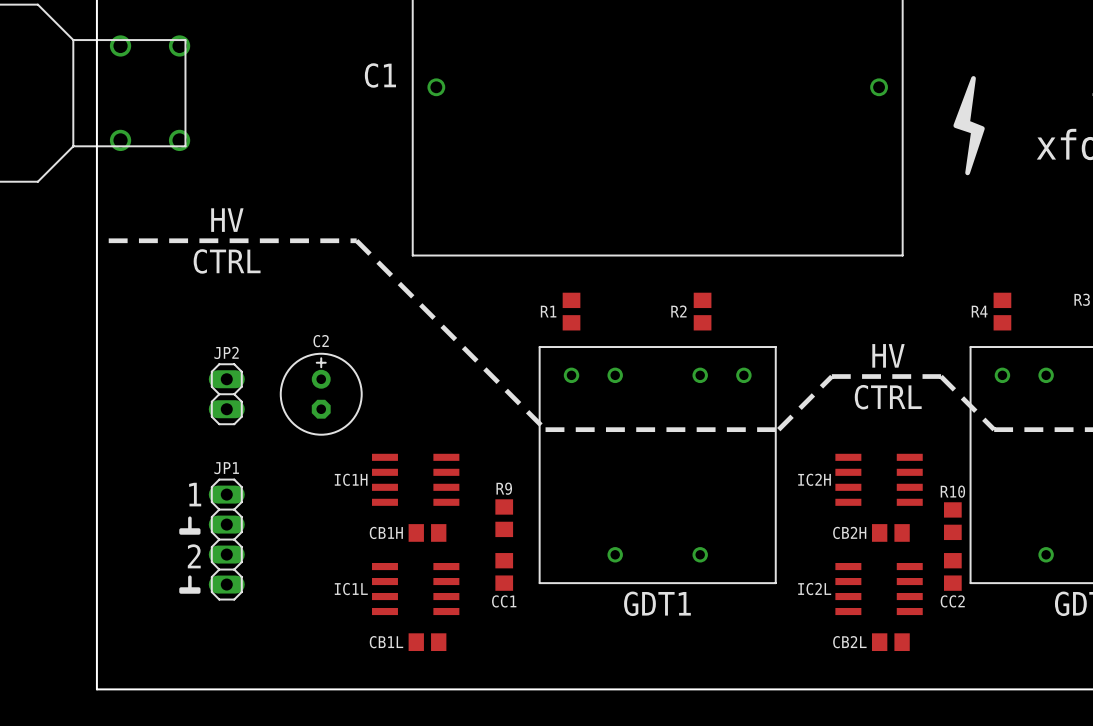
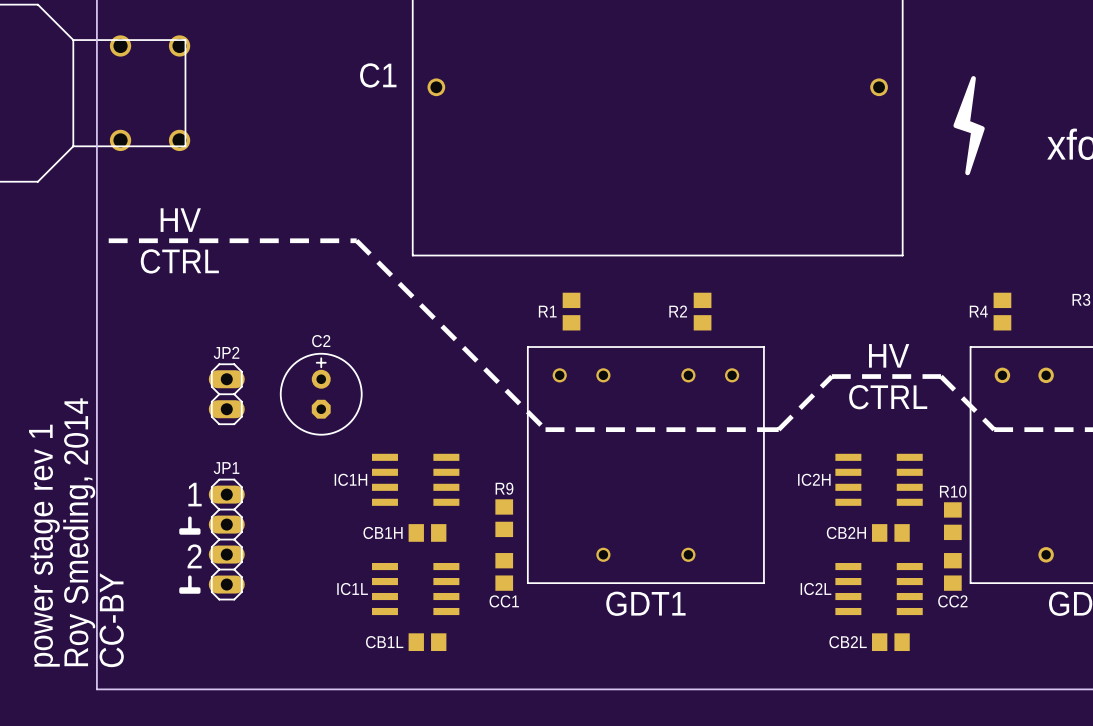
text position: HV (227, 220) -> HV (180, 220)
text position: CTRL (227, 261) -> CTRL (179, 261)
GDT1 footprint: [538, 346, 777, 584] -> [527, 346, 765, 584]
text: none -> power stage rev 1 (44, 545)
text: none -> Roy Smeding, 2014 (79, 532)
text: none -> CC-BY (111, 620)

